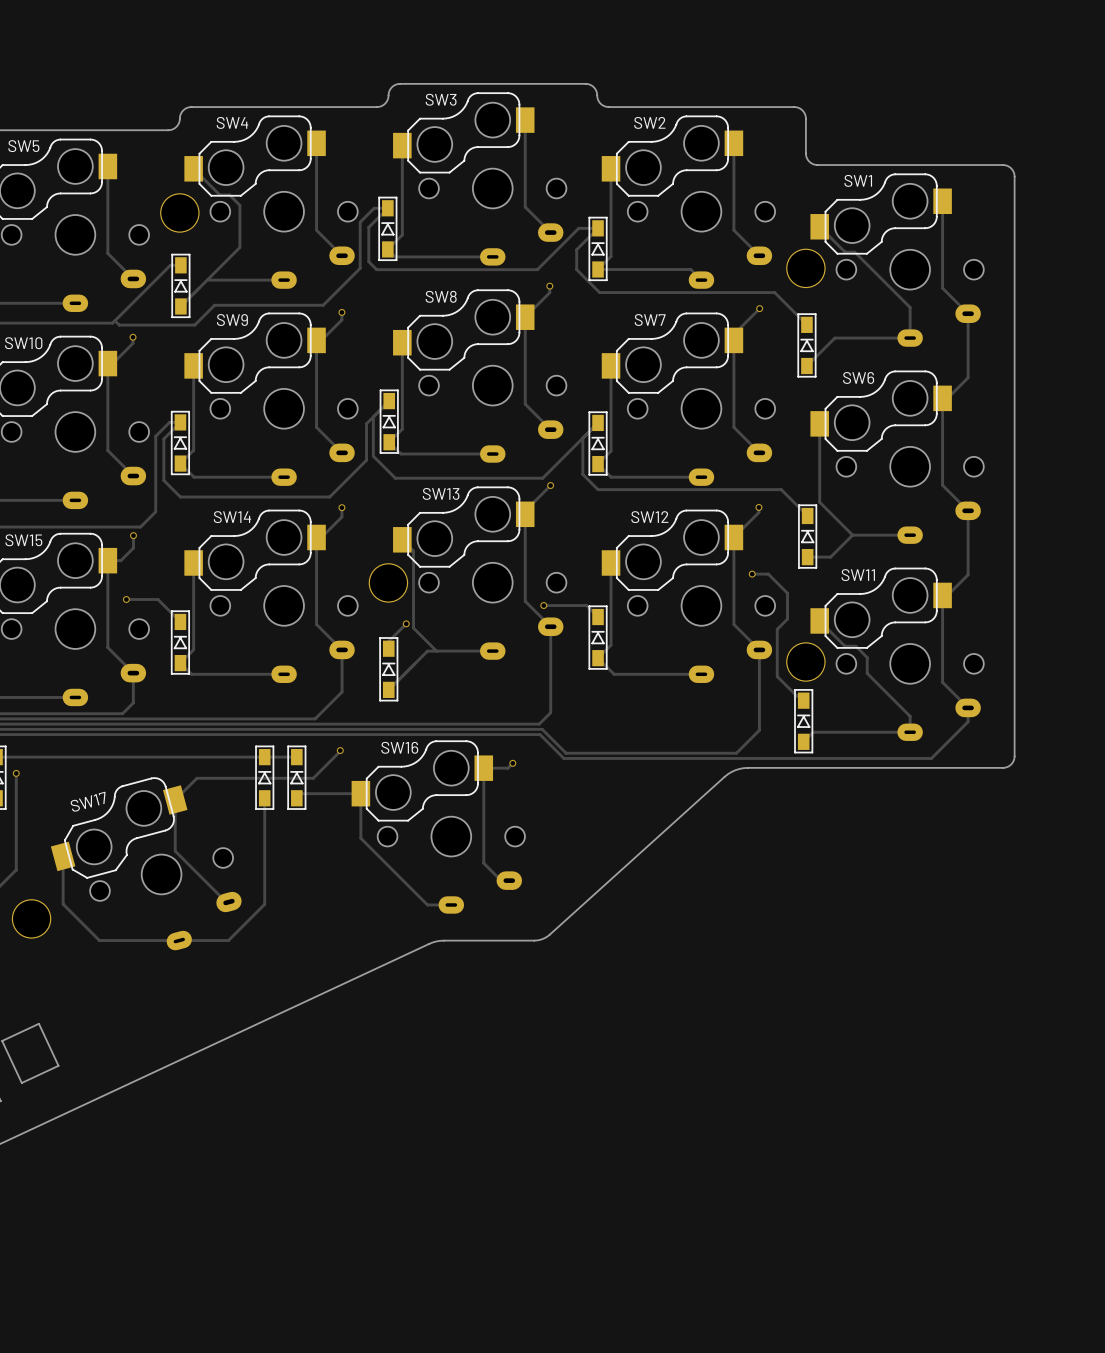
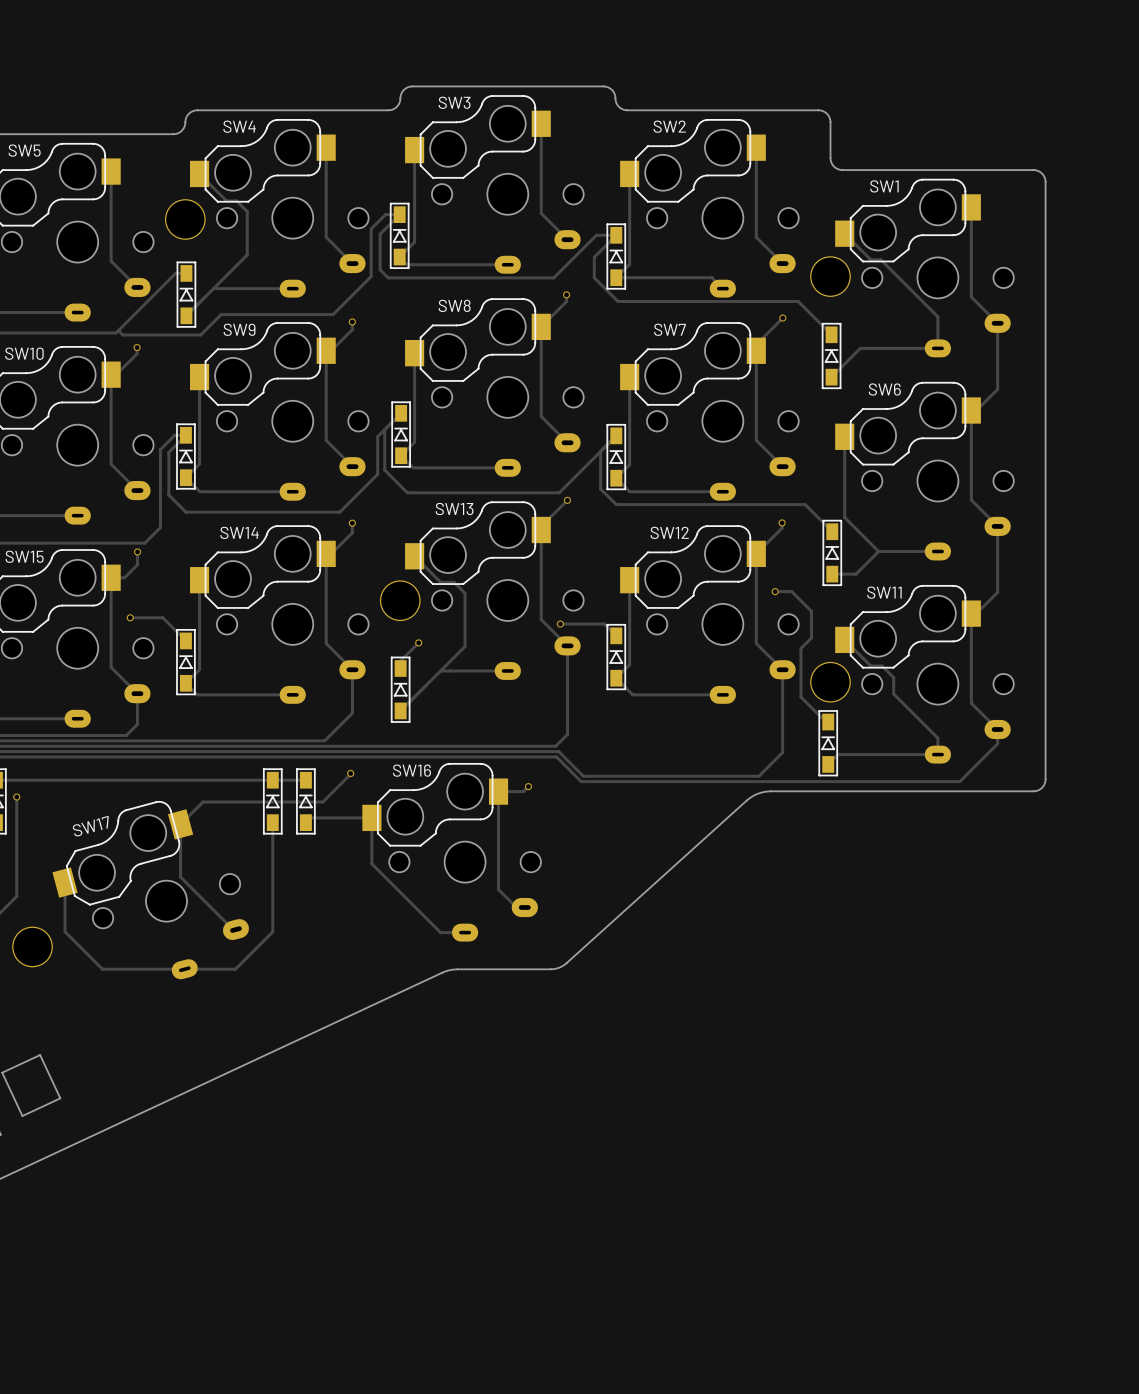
track: (413, 550) (413, 628) (436, 651) -> (426, 567) (440, 582) (454, 582) (465, 593) (465, 646) (440, 670)

